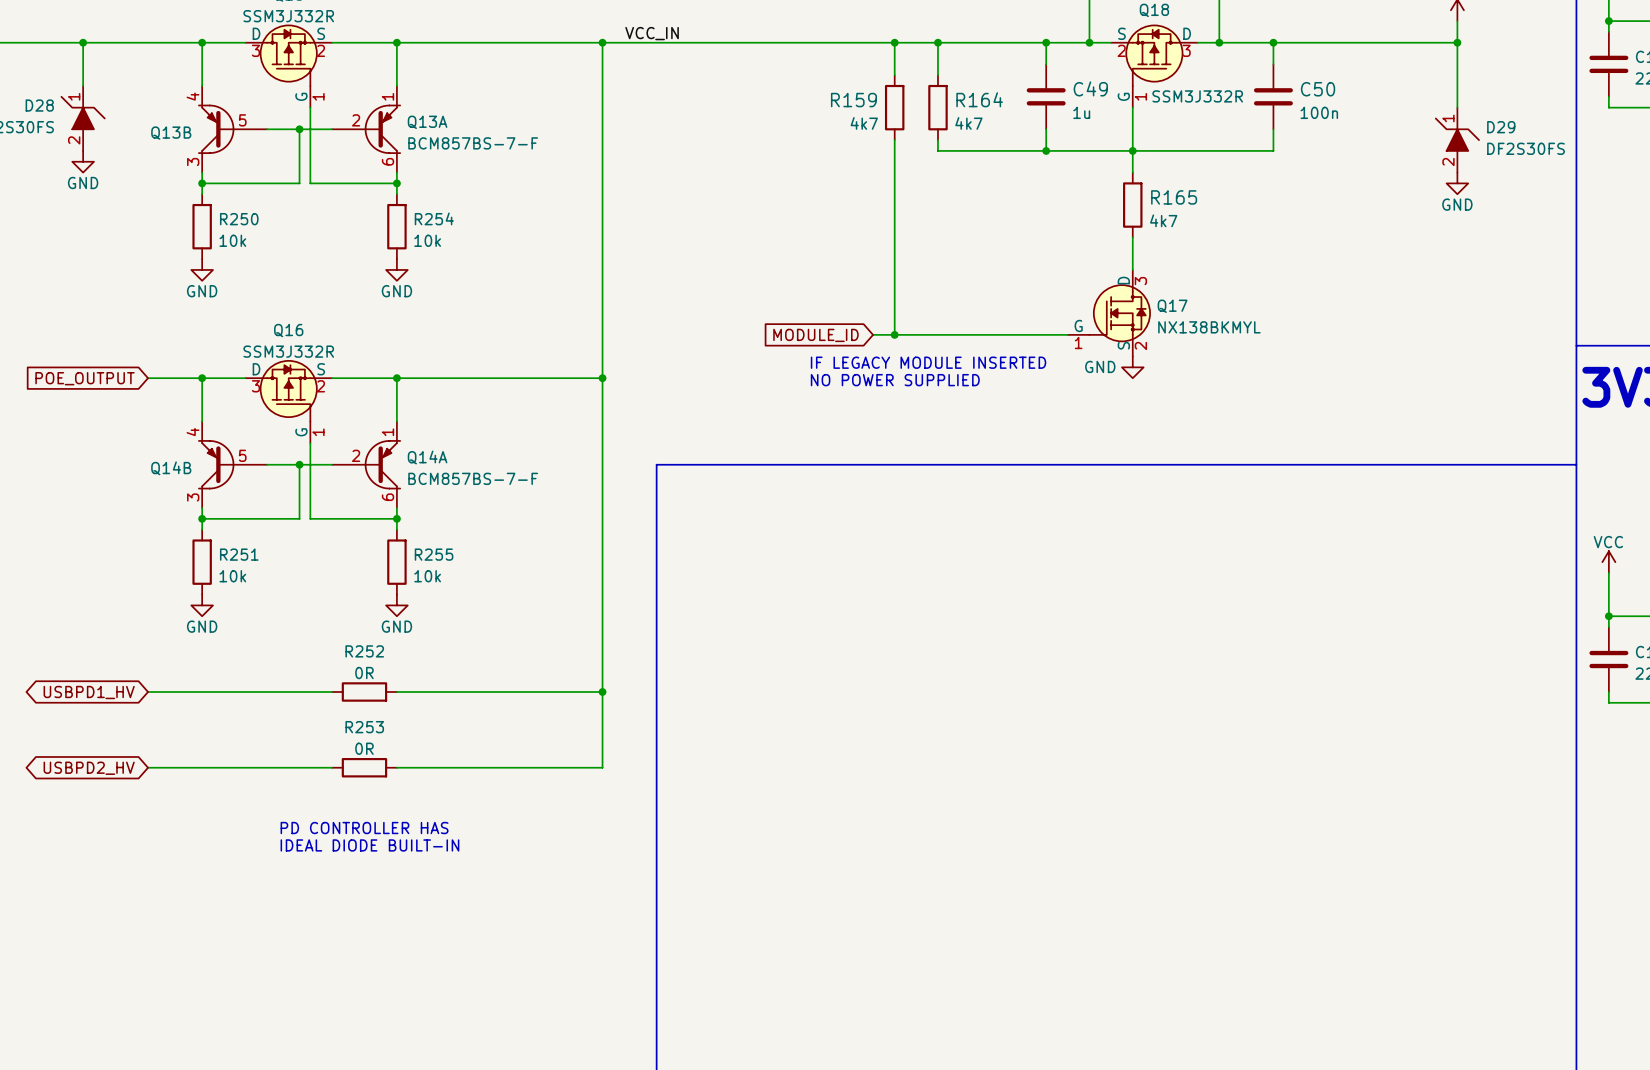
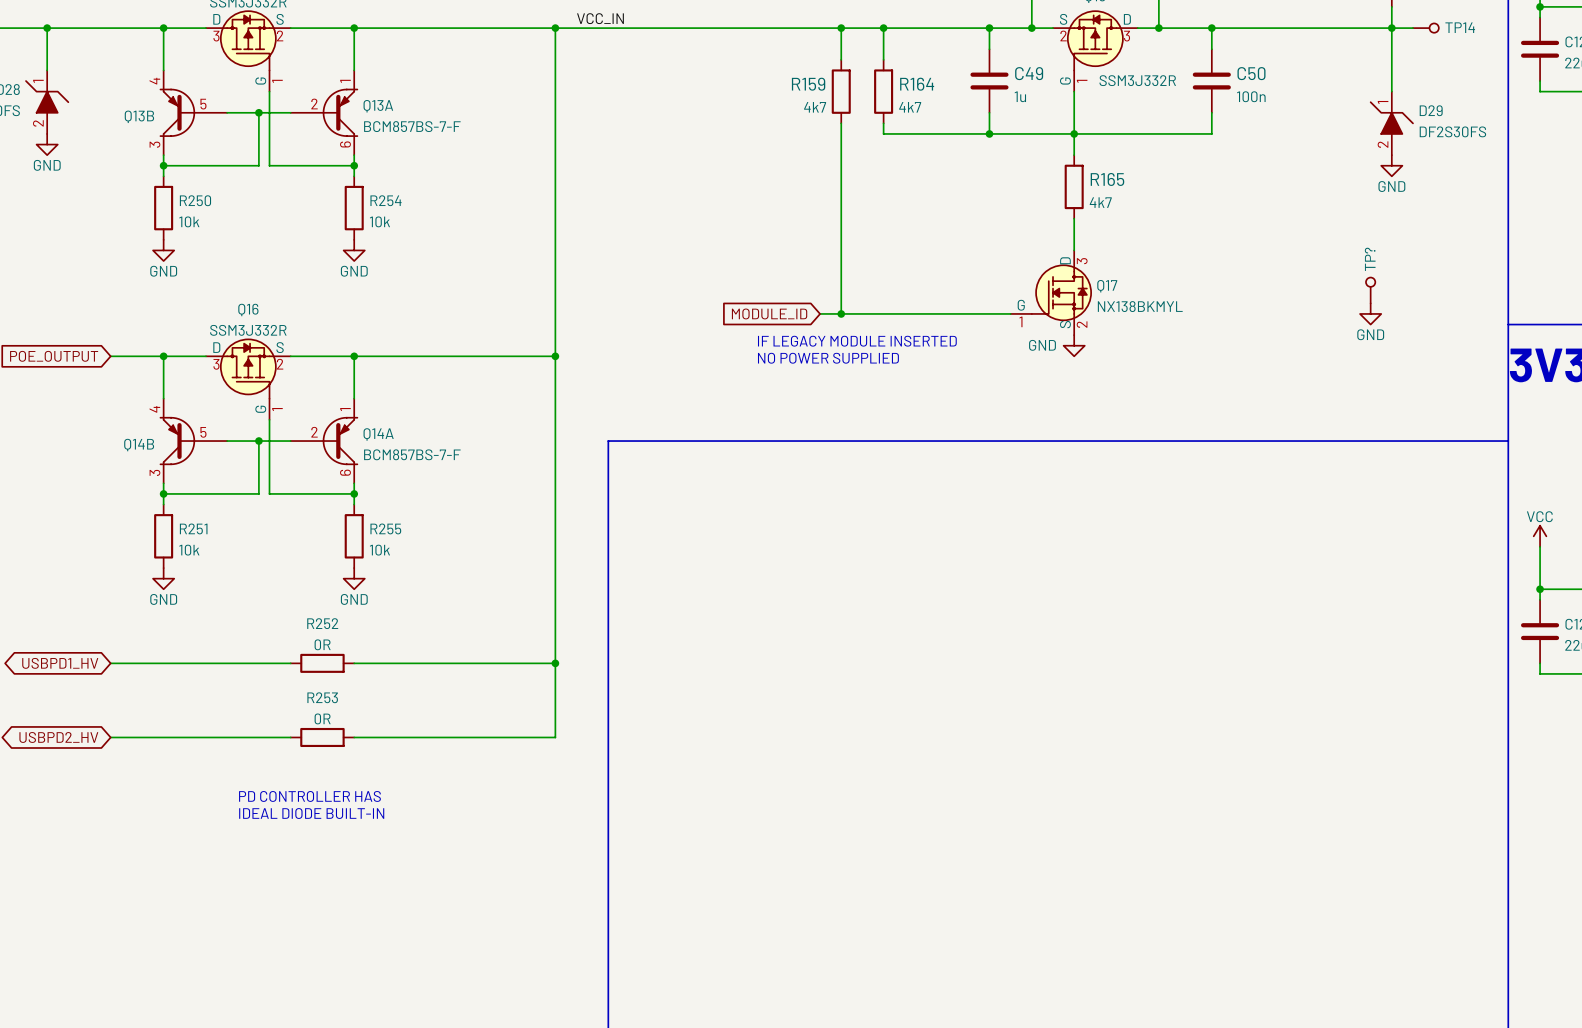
wire: none -> (1391, 28) (1412, 28)
TP14: none -> (1425, 28)
TP?: none -> (1370, 290)
power symbol: none -> GND (1370, 313)

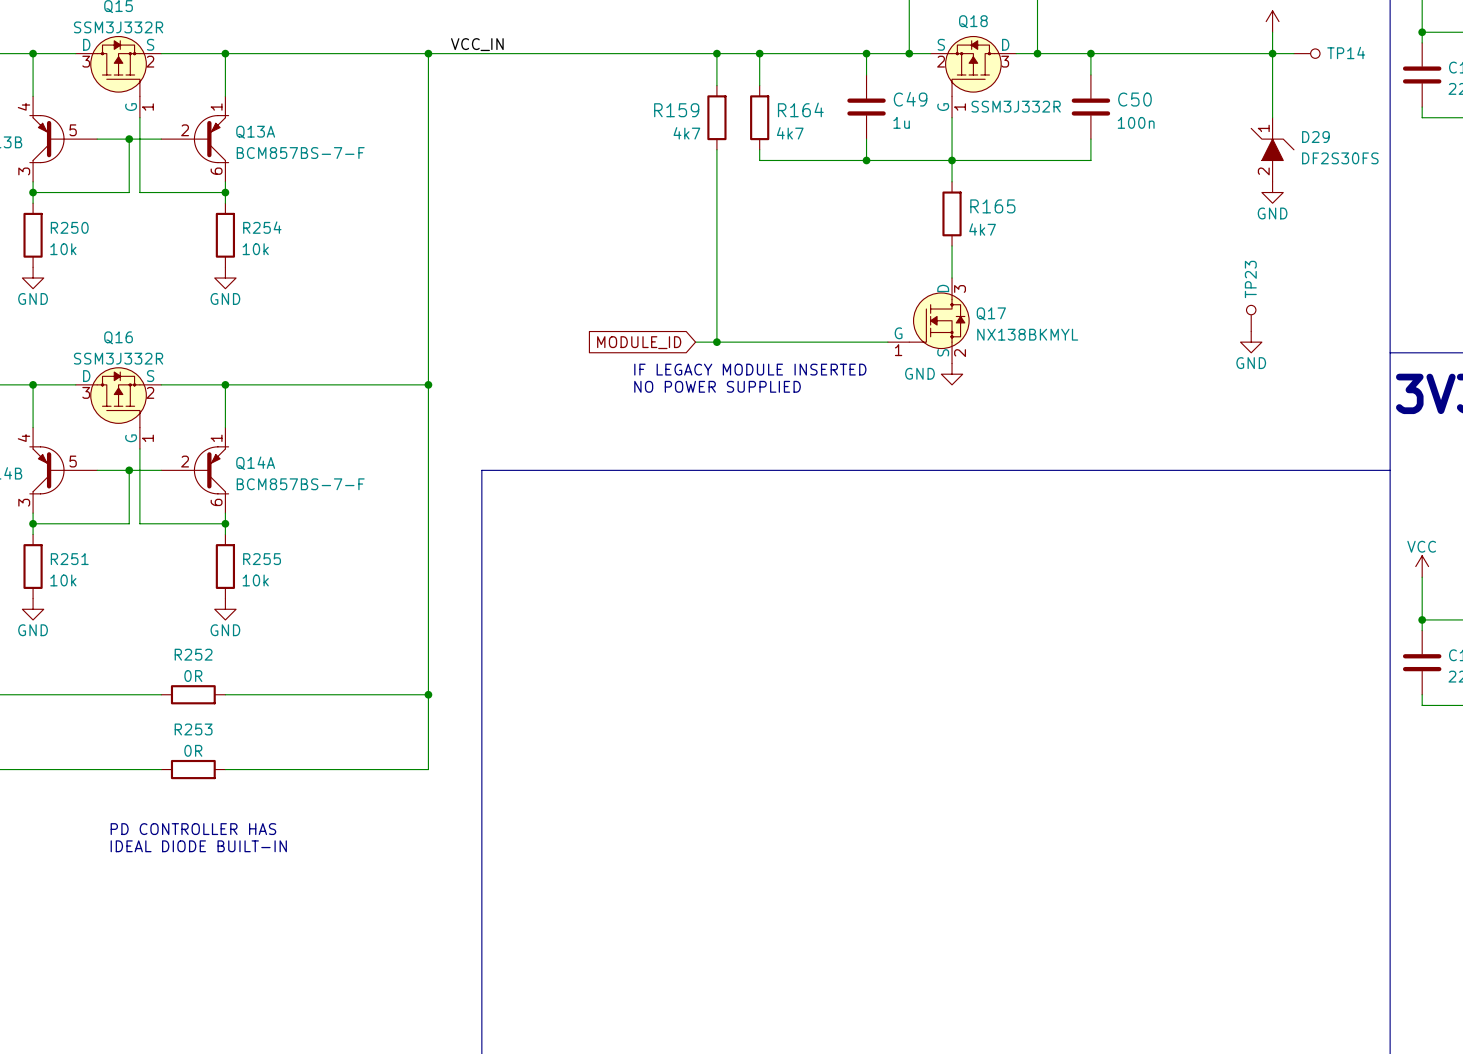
TP? name: TP? (1370, 259) -> TP23 (1250, 279)

